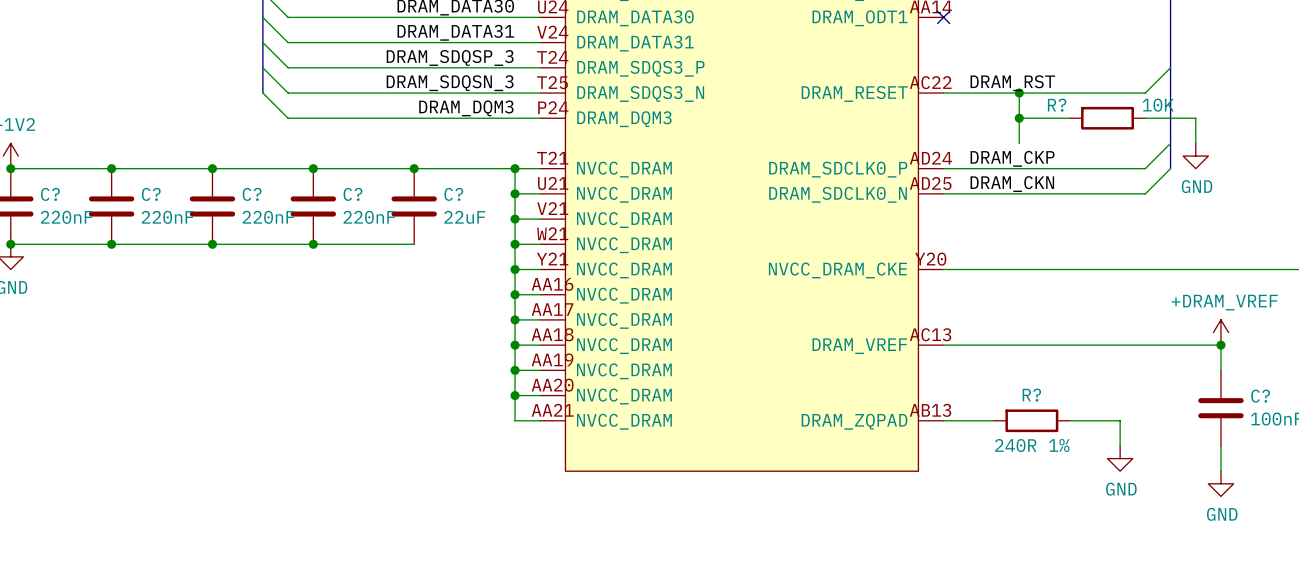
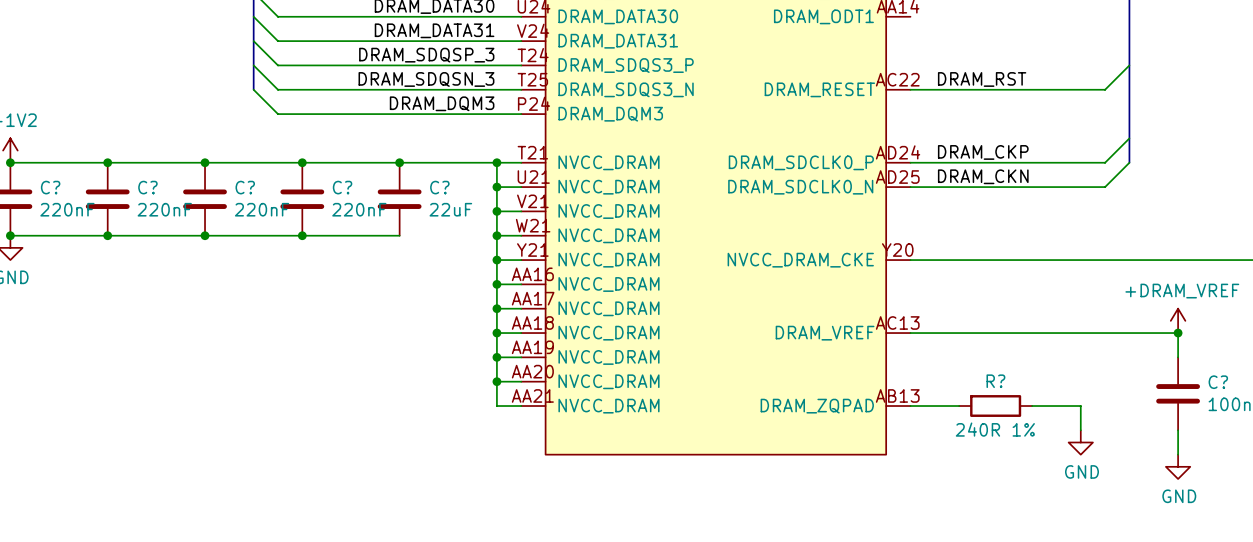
no-connect mark: (943, 17) -> none
wire: (1019, 93) (1019, 143) -> none
junction: (1019, 93) -> none
wire: (1019, 118) (1069, 118) -> none
junction: (1019, 118) -> none
R?: 10K (1107, 118) -> none
wire: (1145, 118) (1195, 118) (1195, 143) -> none
power symbol: GND (1195, 156) -> none

